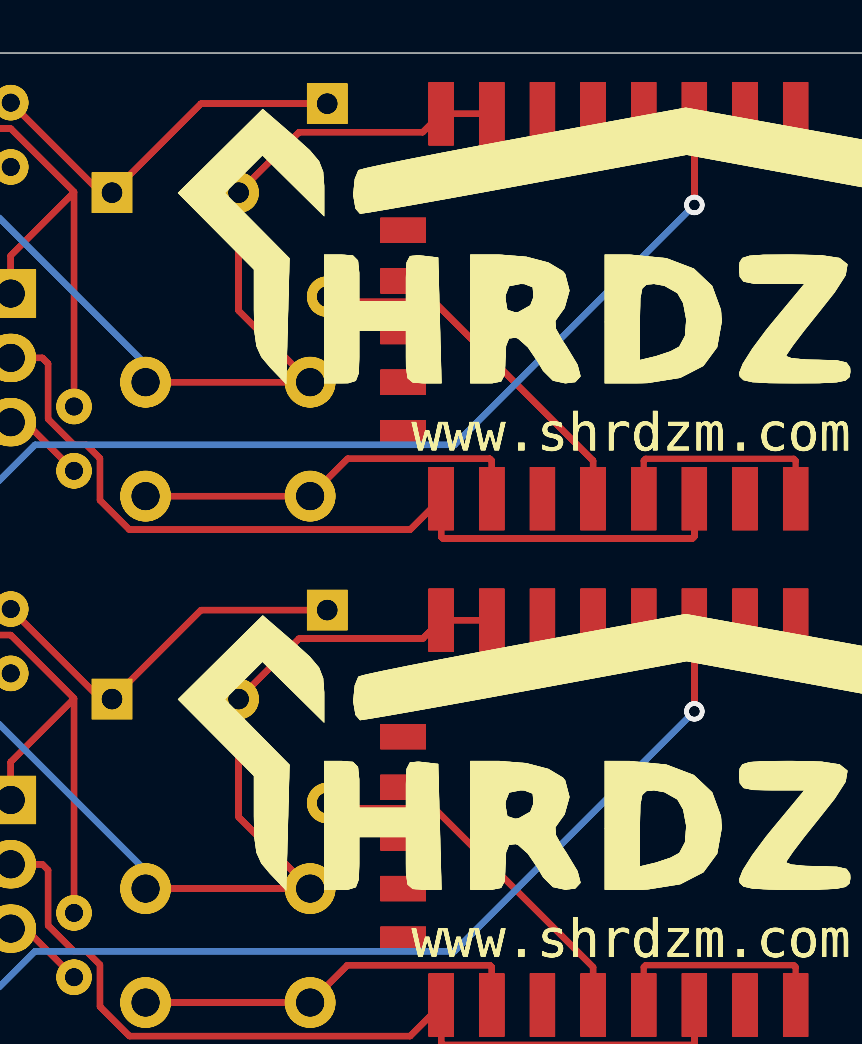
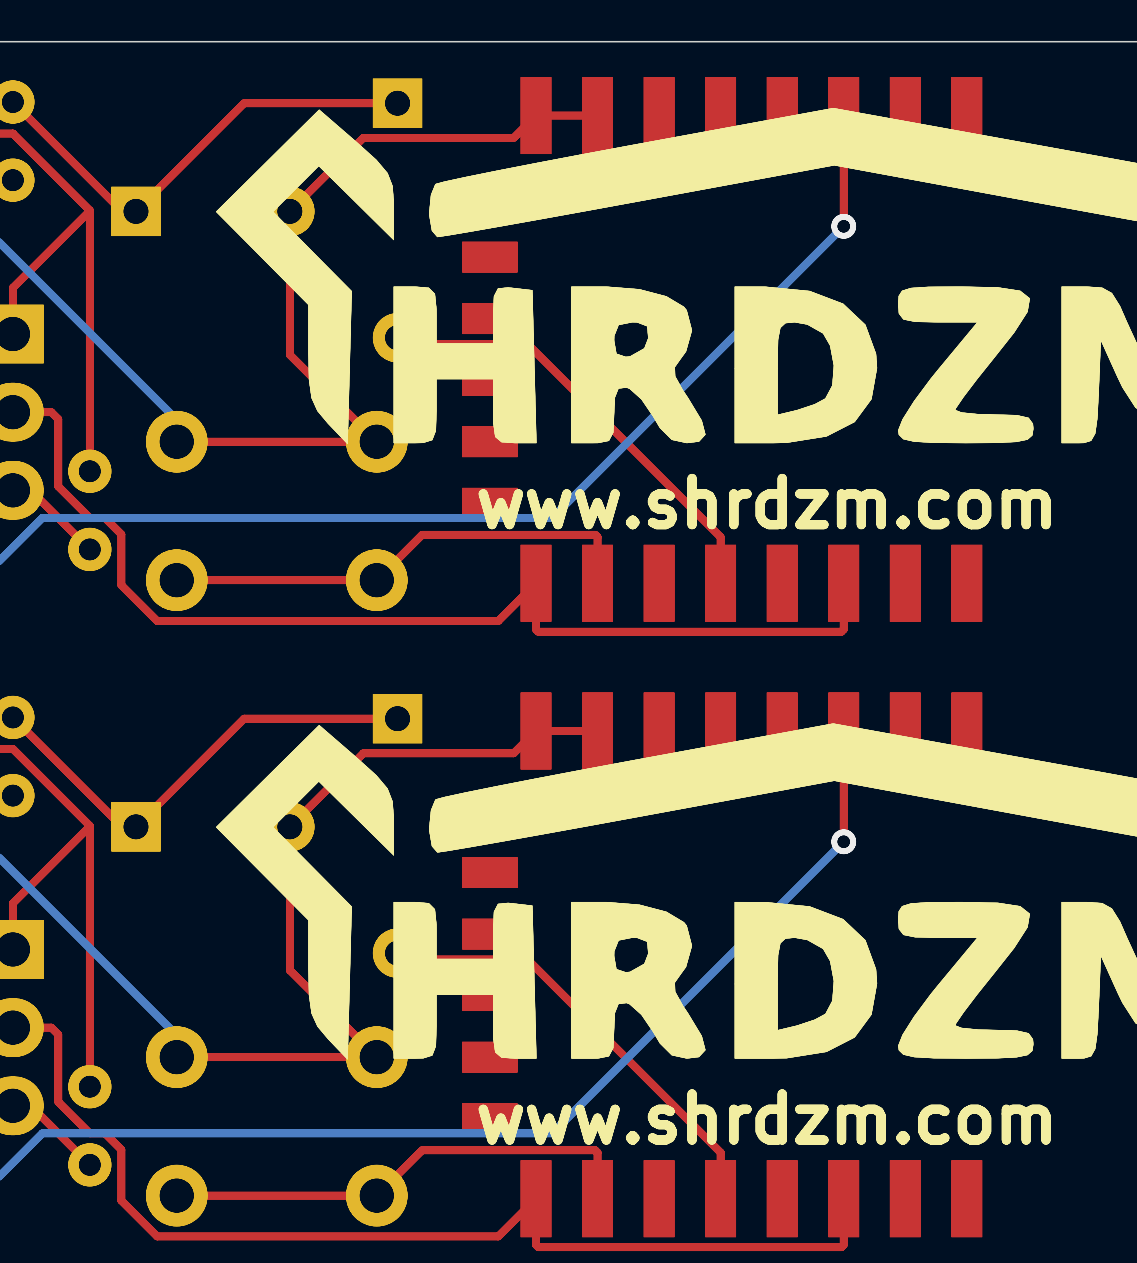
top track: (795, 498) (795, 460) (793, 458) (645, 458) (643, 460) (643, 498) -> none
top track: (795, 1005) (795, 967) (793, 965) (645, 965) (643, 967) (643, 1005) -> none

